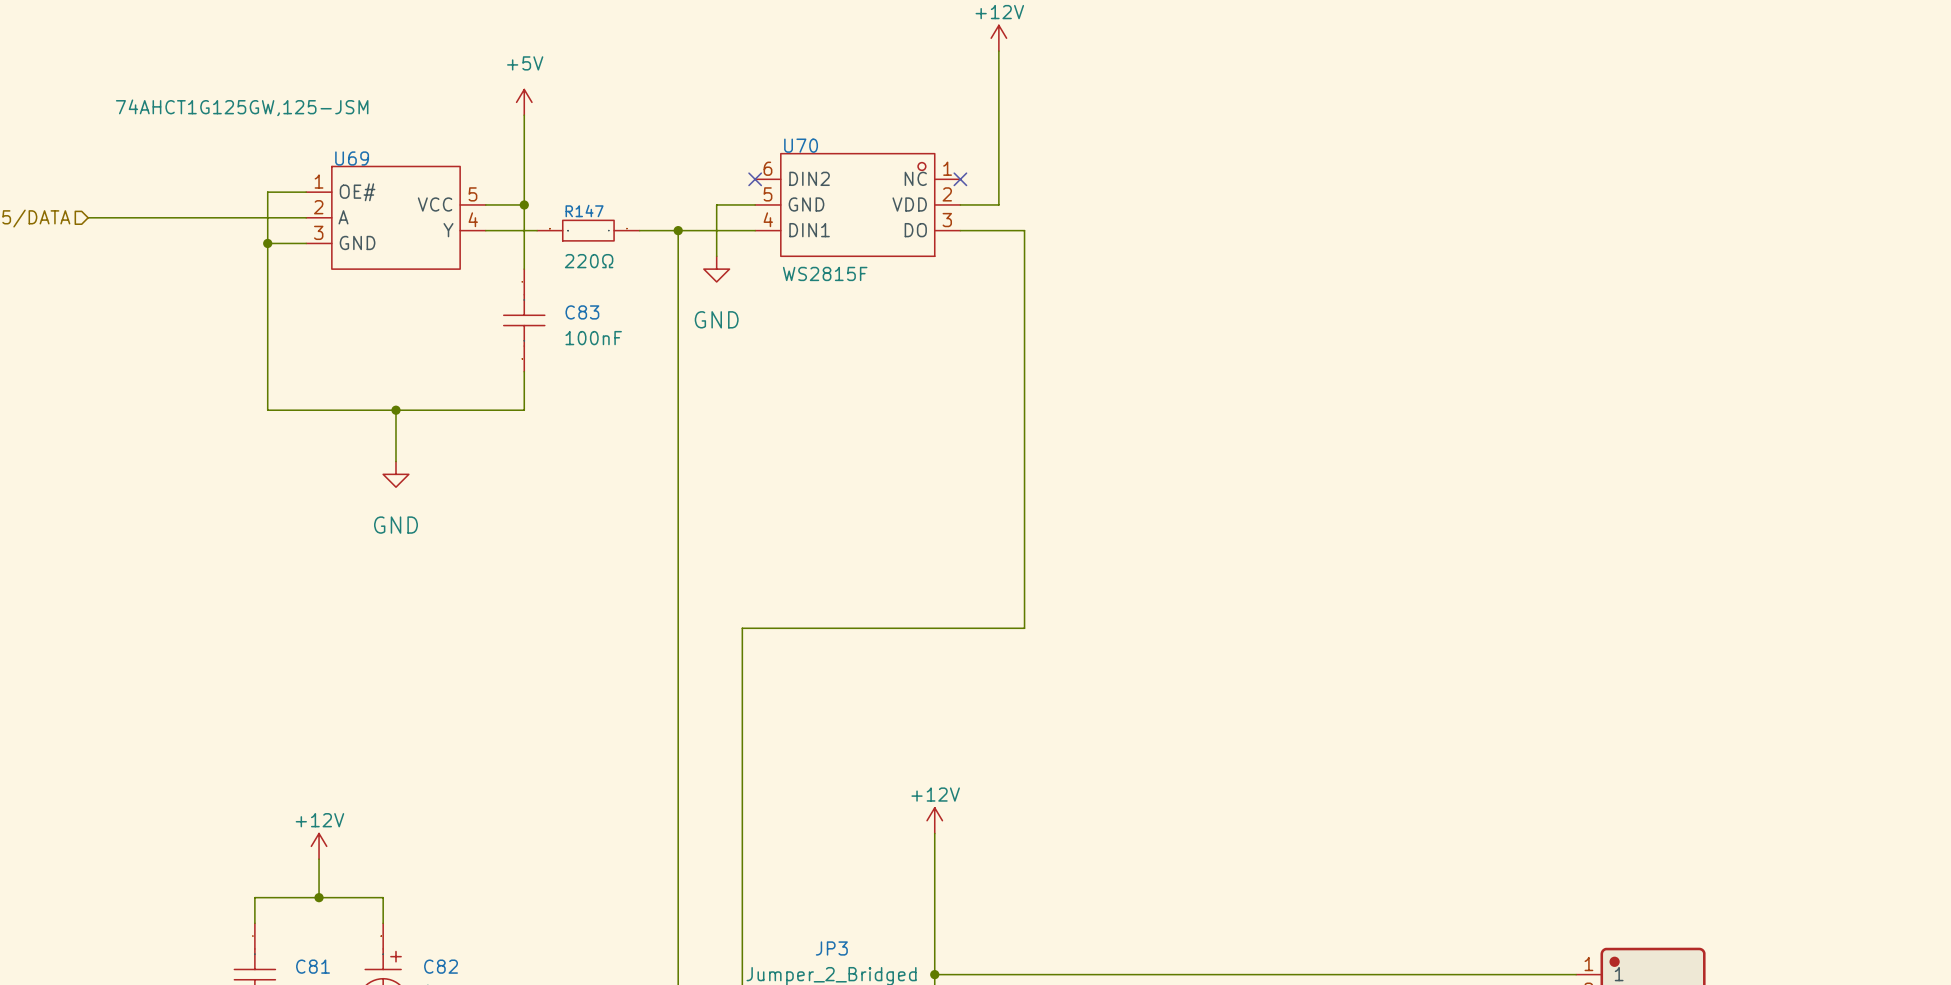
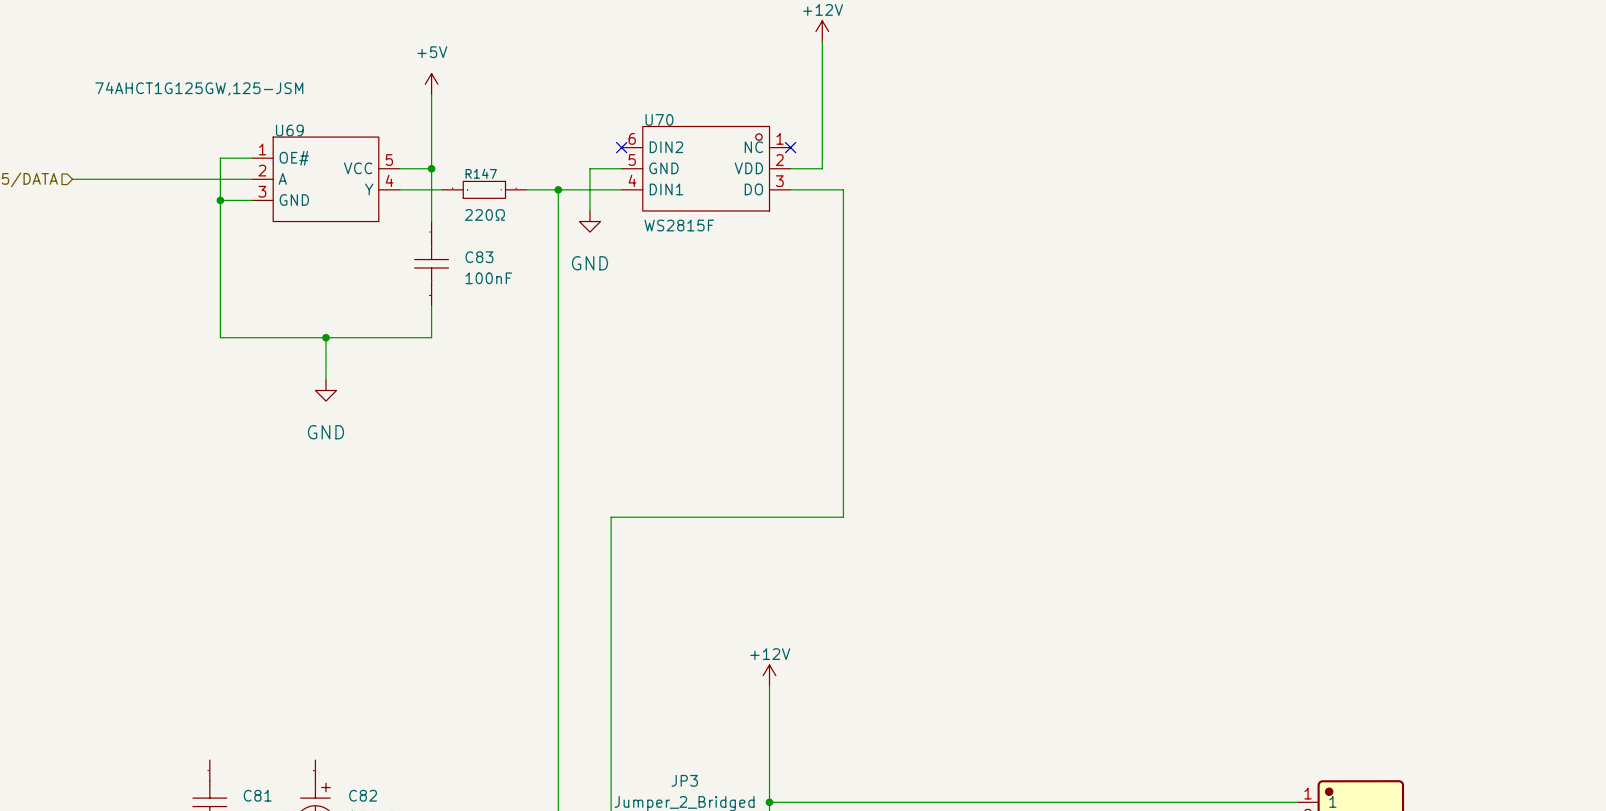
power symbol: +12V (319, 846) -> none
wire: (319, 859) (319, 897) -> none
junction: (319, 897) -> none
wire: (254, 923) (254, 897) (383, 897) (383, 923) -> none

